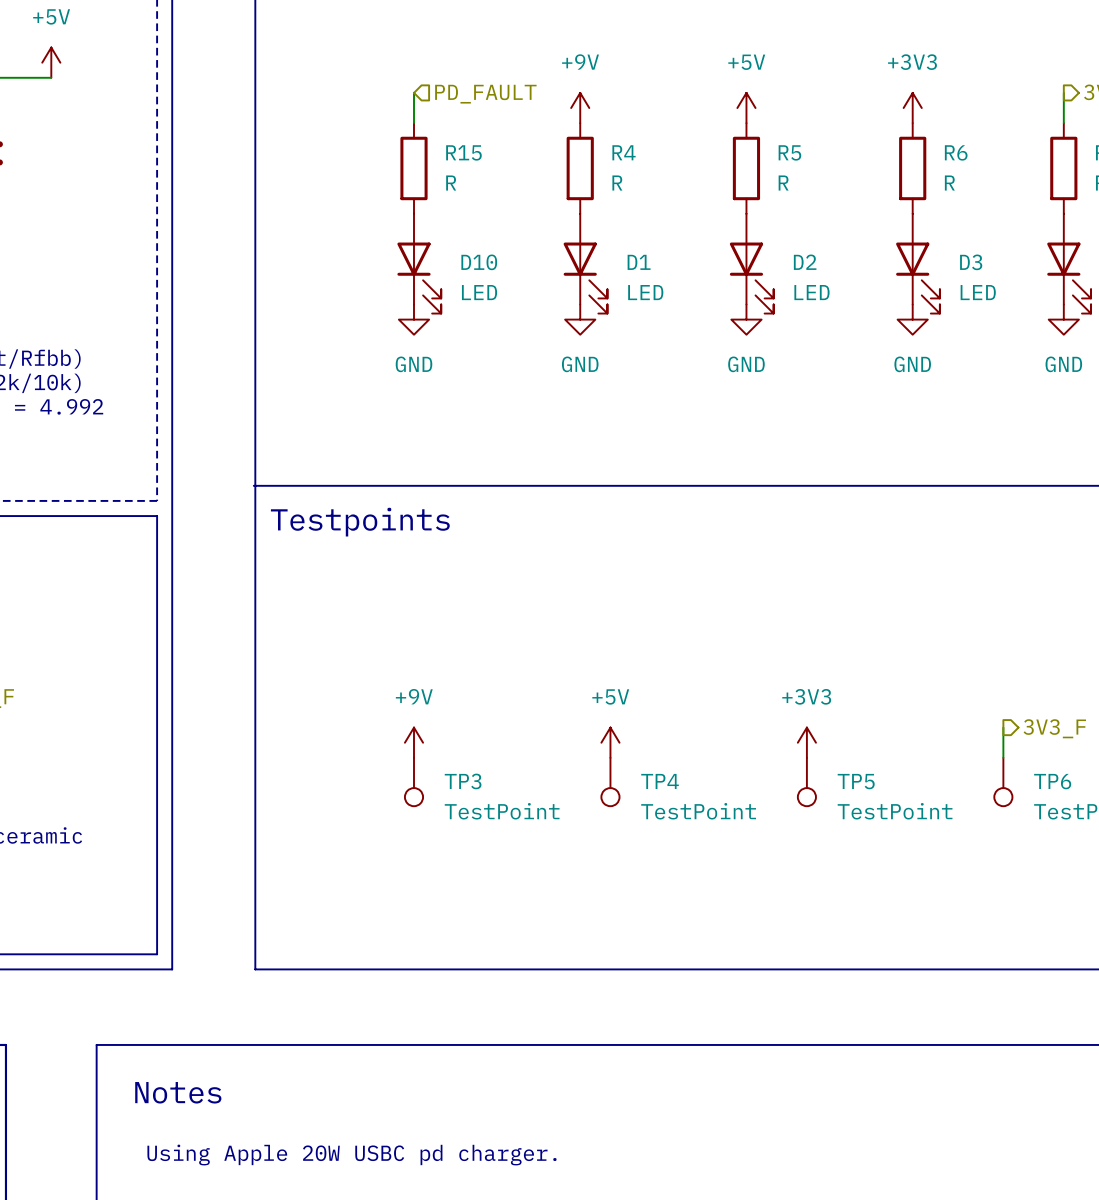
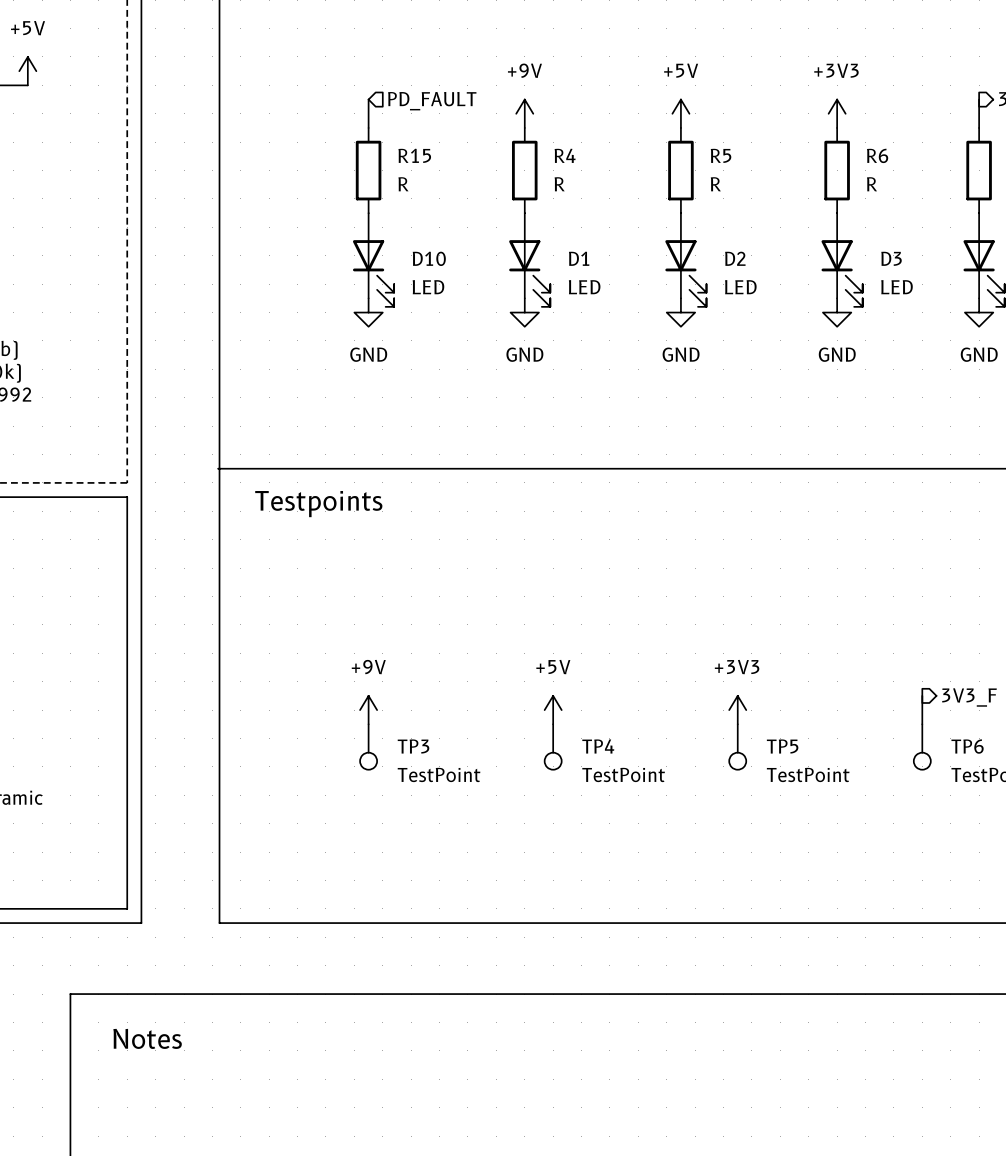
text: Using Apple 20W USBC pd charger. (351, 1155) -> none

